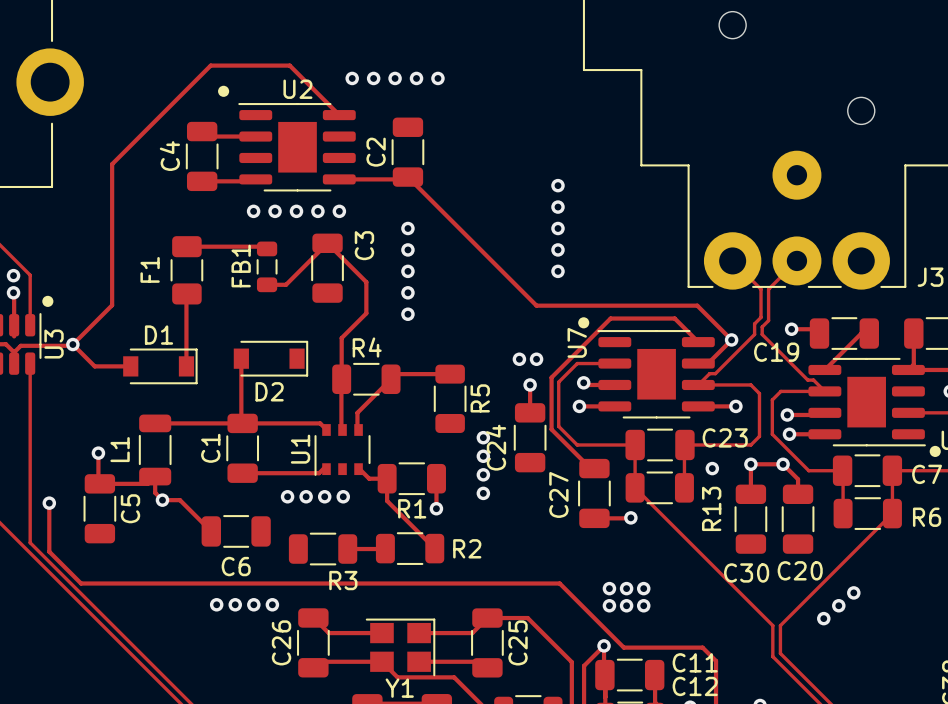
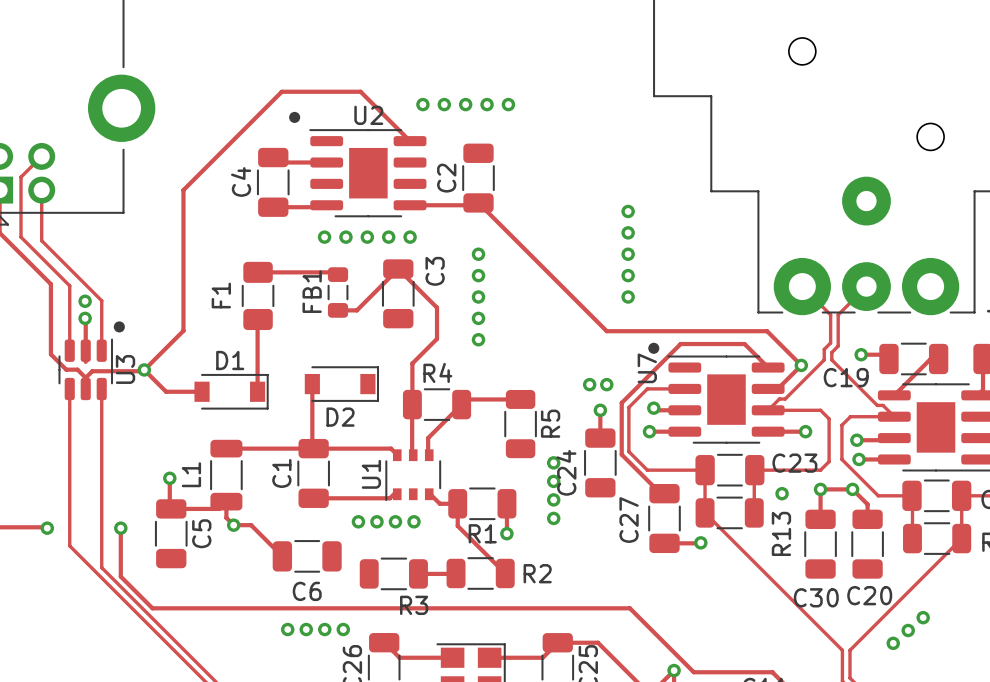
via: (609, 588) -> none
via: (626, 588) -> none
via: (643, 588) -> none
via: (609, 605) -> none
via: (626, 605) -> none
via: (643, 605) -> none

